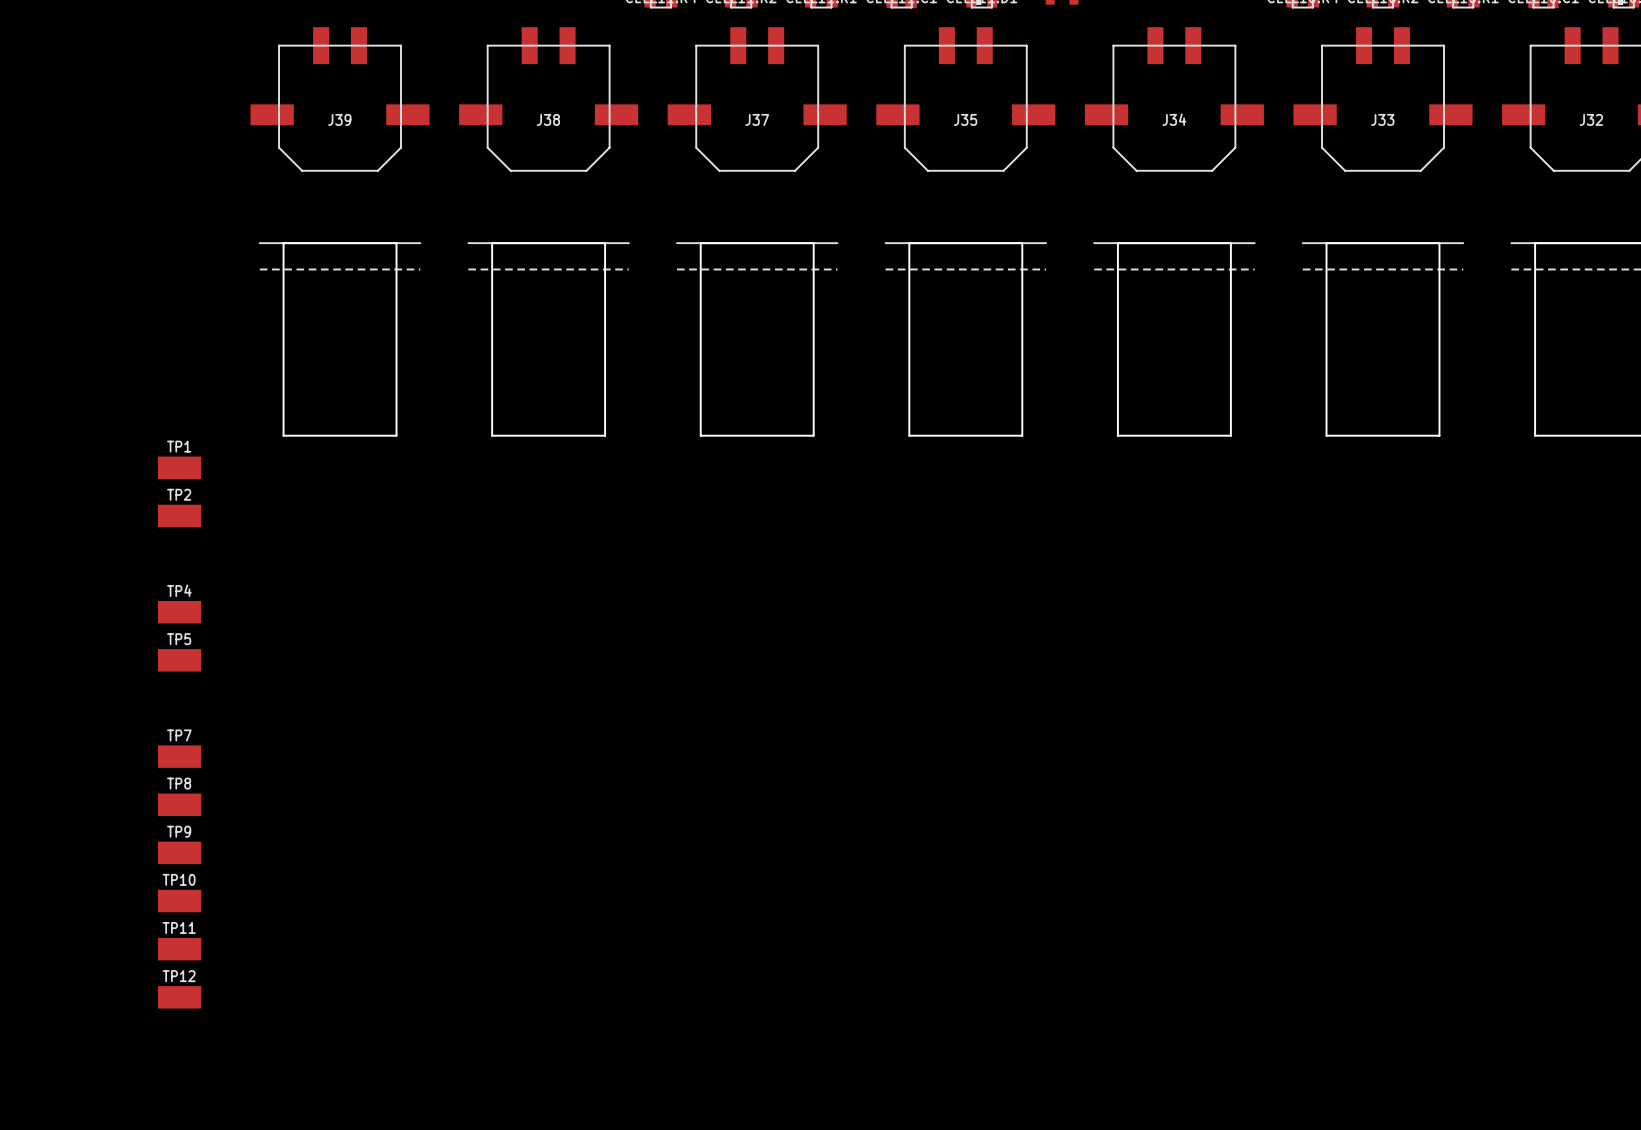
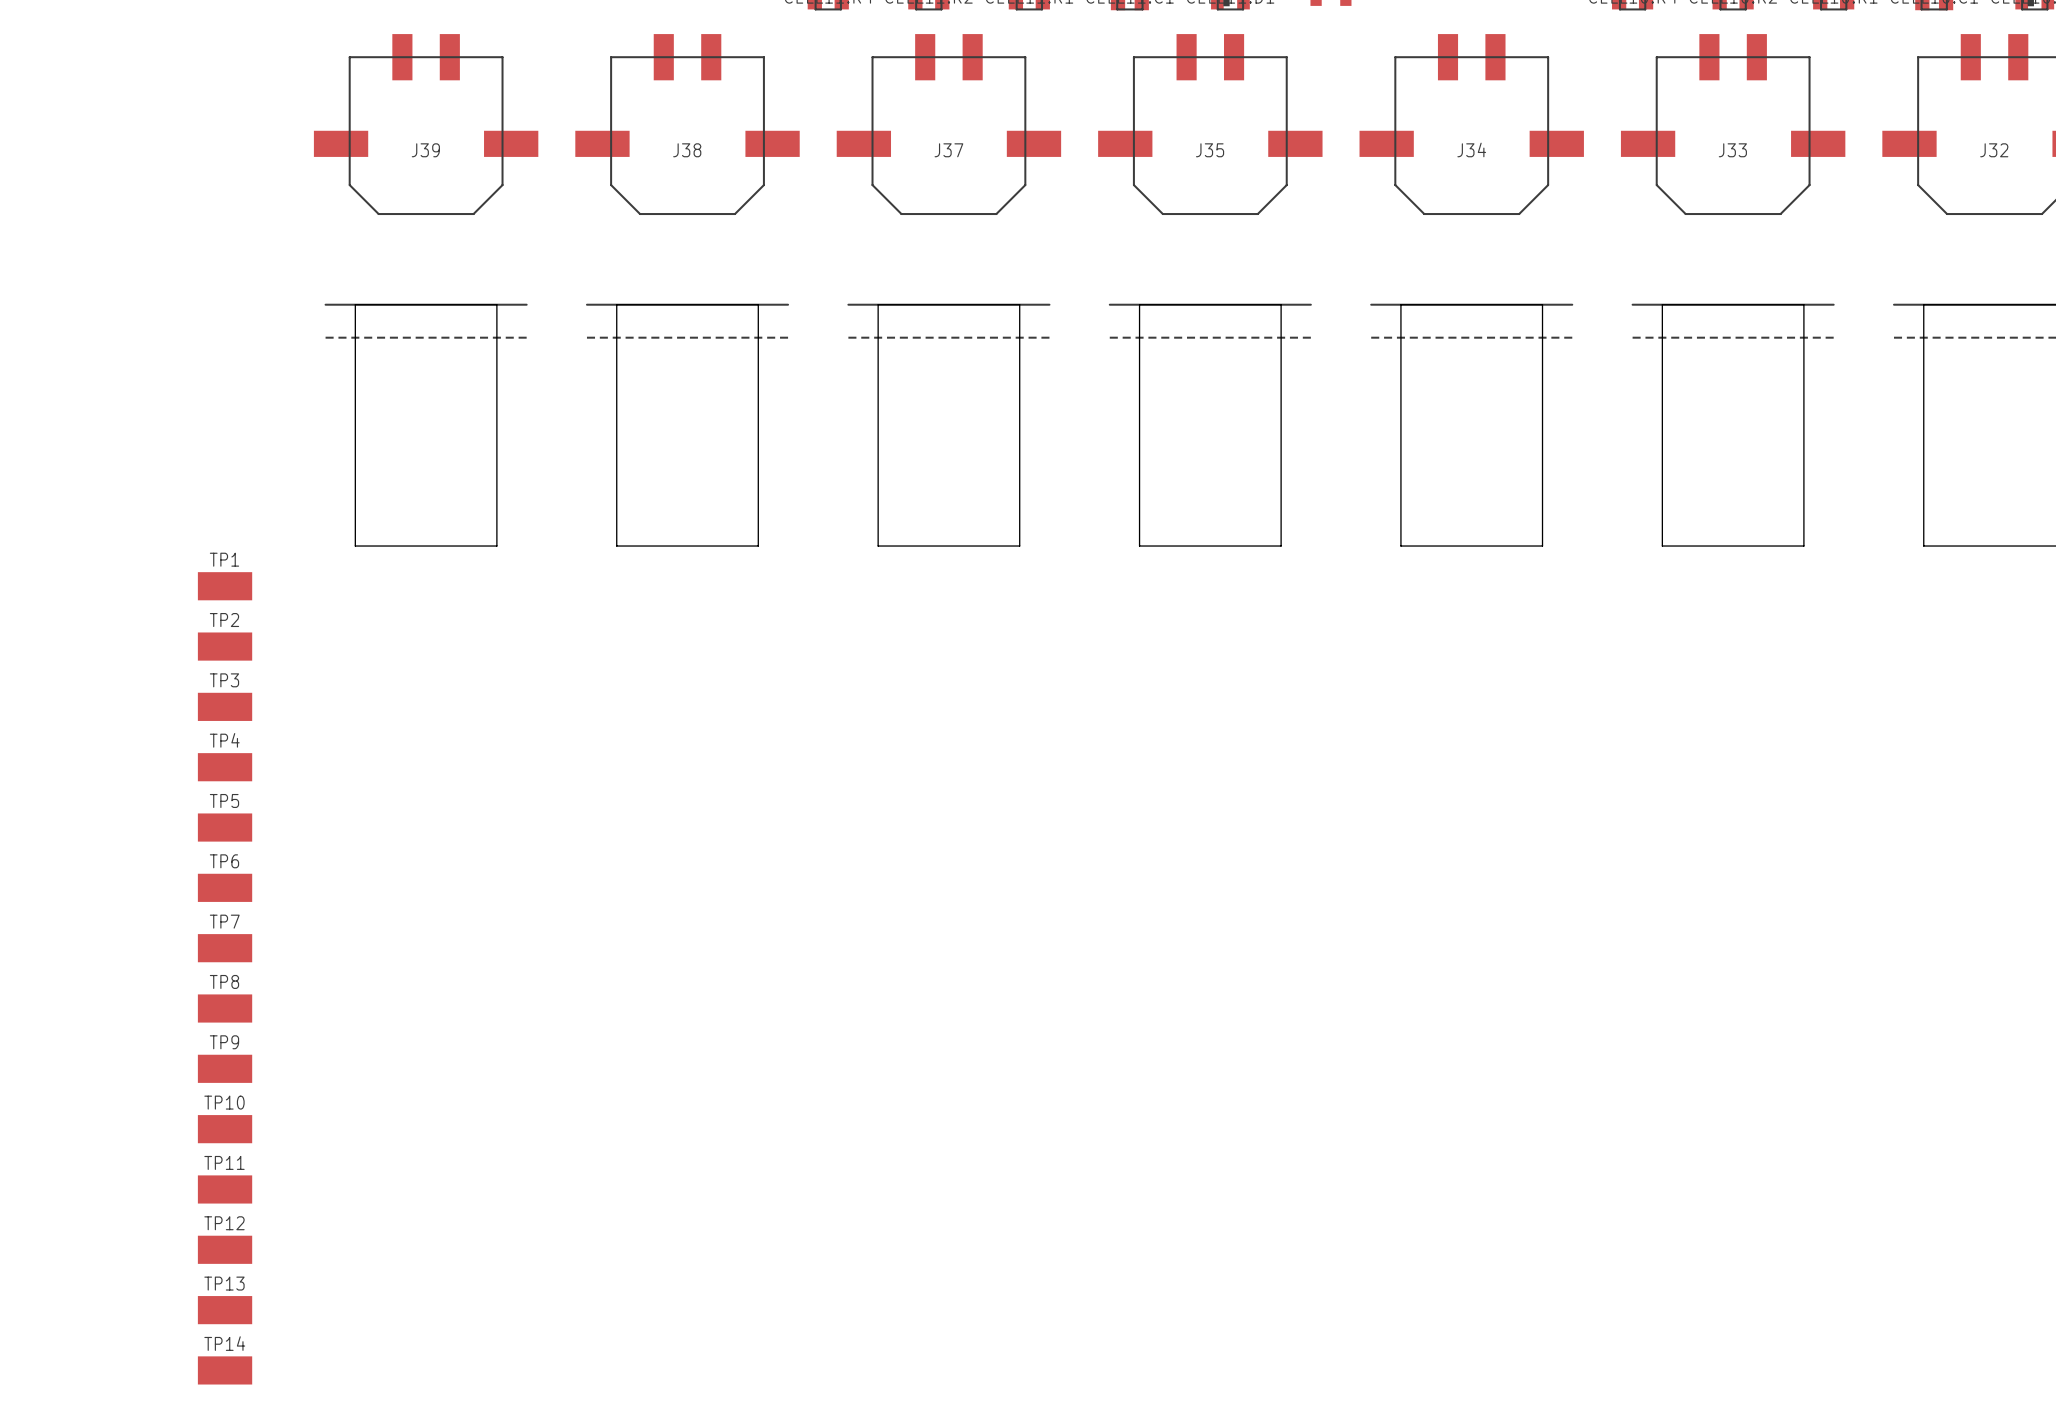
TP3: none -> (225, 706)
TP6: none -> (225, 887)
TP13: none -> (225, 1310)
TP14: none -> (225, 1370)

